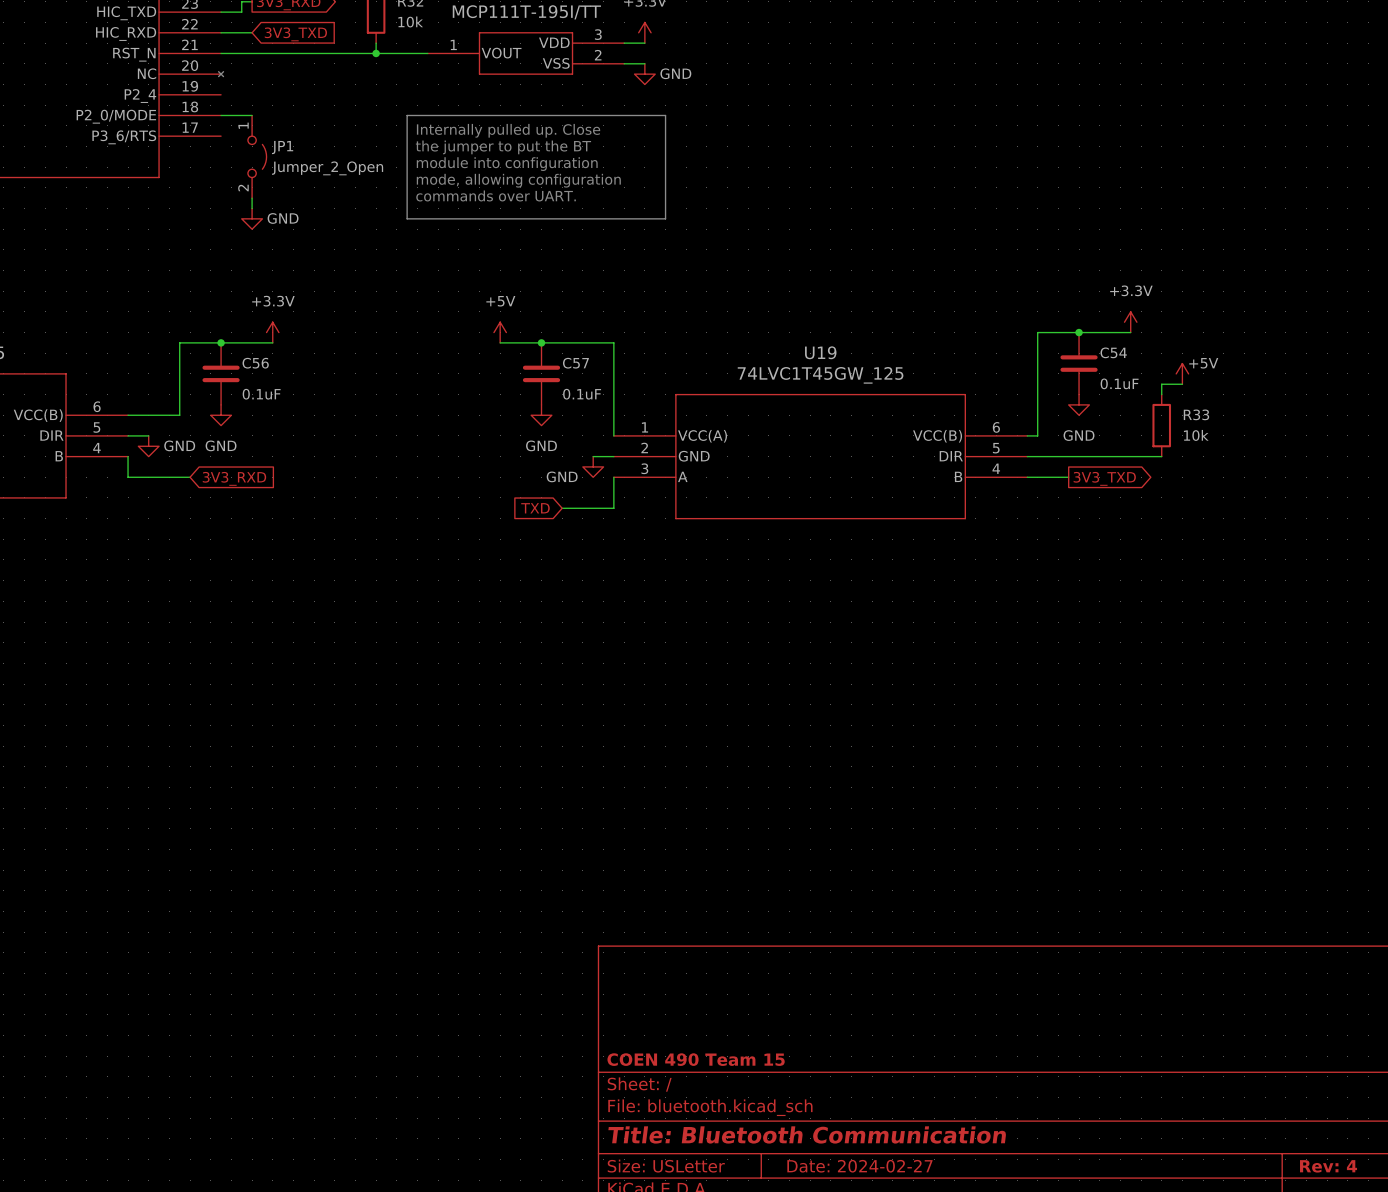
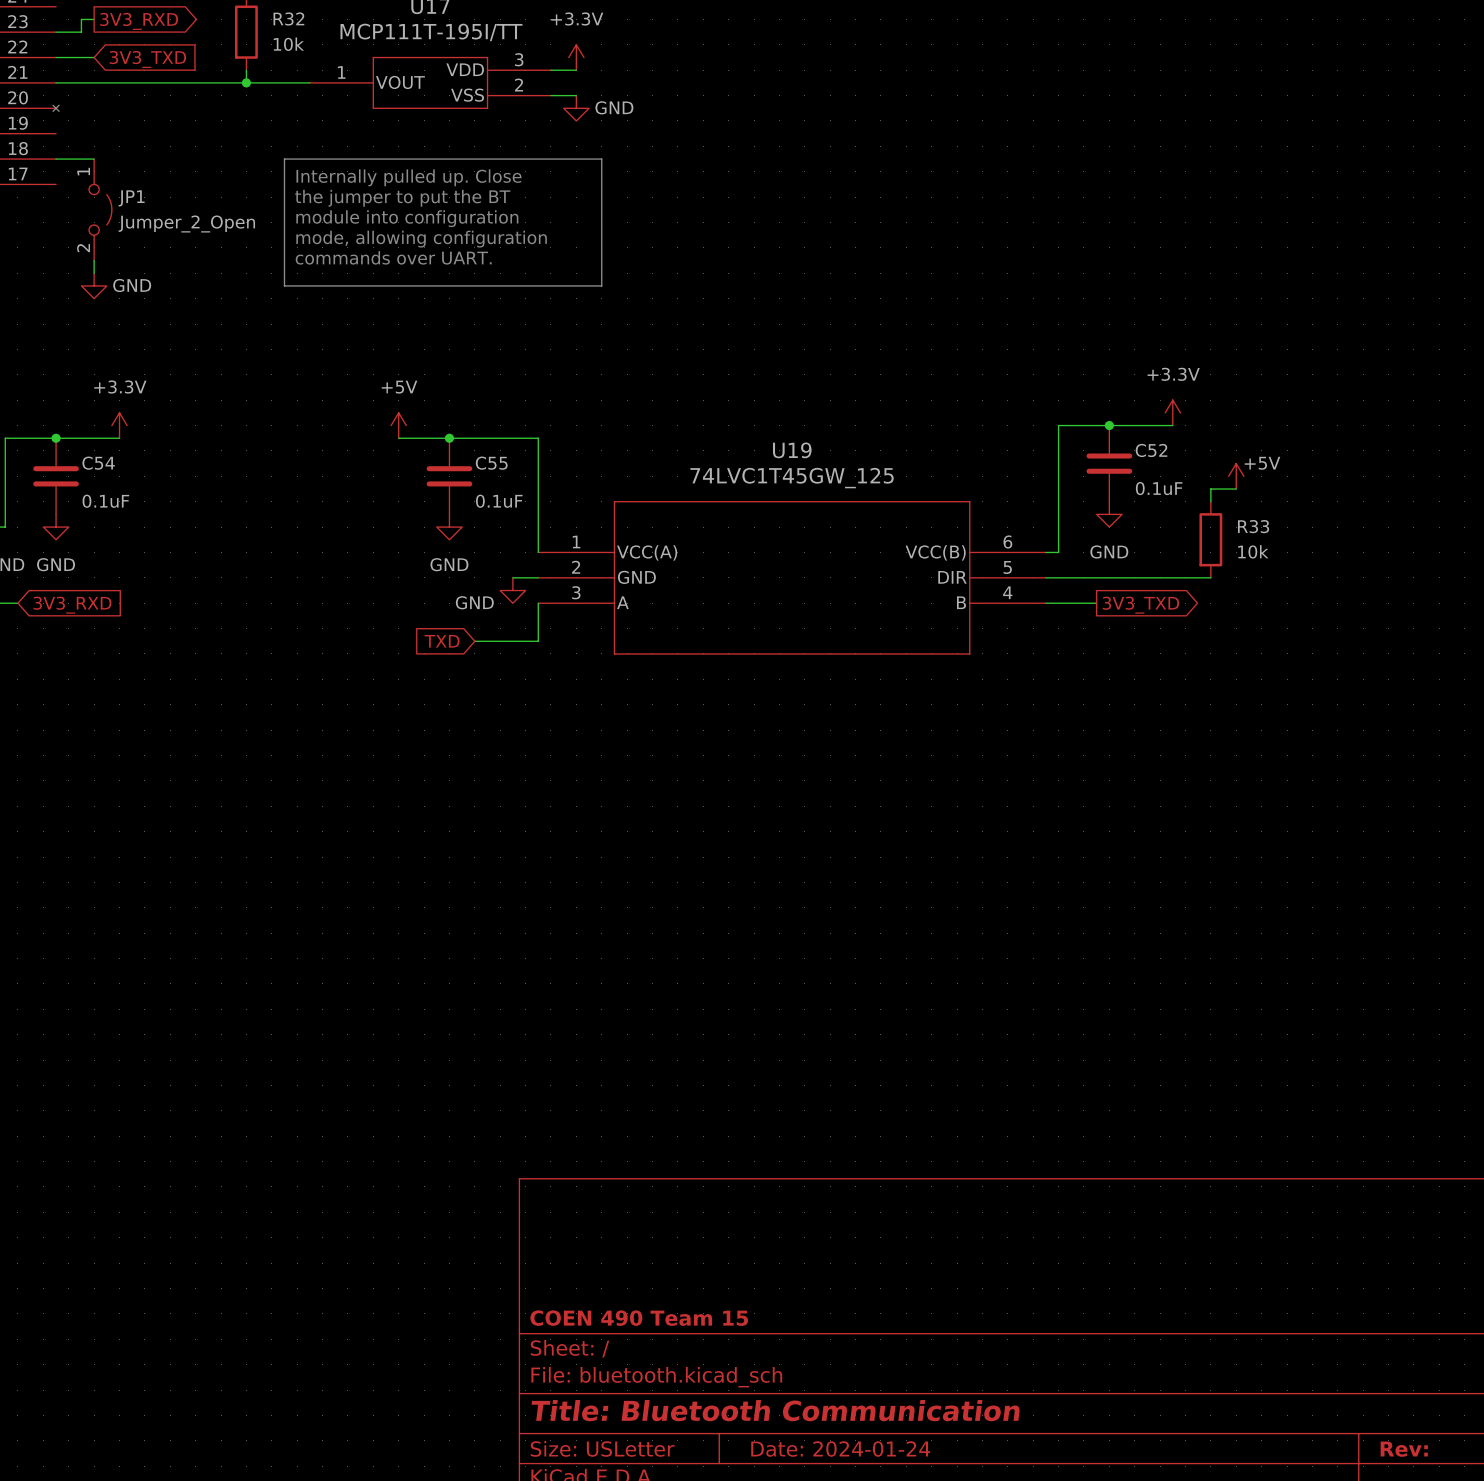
C54 name: C54 (1113, 352) -> C52 (1151, 450)
C56 name: C56 (255, 363) -> C54 (98, 463)
C57 name: C57 (575, 363) -> C55 (491, 463)
title block: Date: 2024-02-27 (859, 1166) -> Date: 2024-01-24 (840, 1449)
title block: Rev: 4 (1328, 1166) -> Rev: (1404, 1449)

